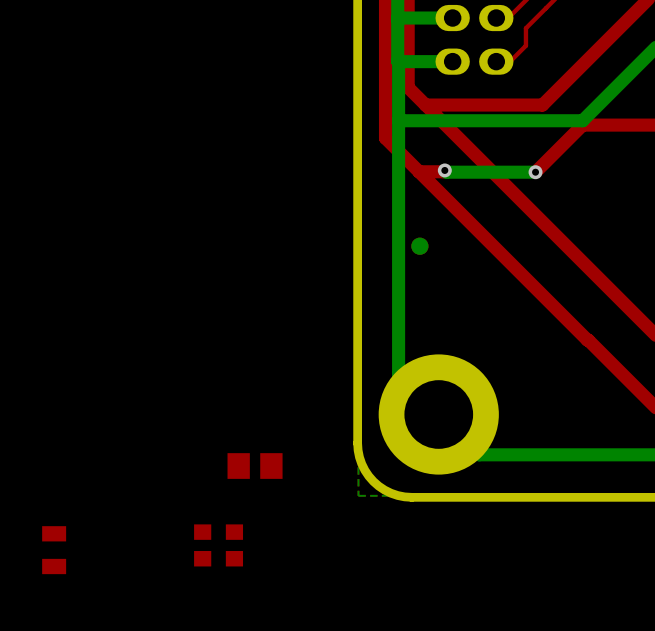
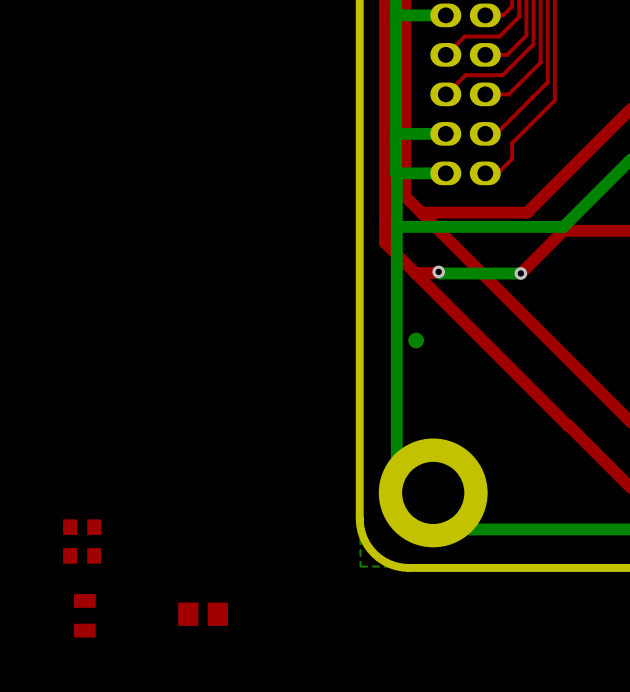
part position: (255, 466) -> (203, 614)
part rotation: 0° (218, 545) -> 90° clockwise (82, 541)
part position: (218, 545) -> (82, 541)

